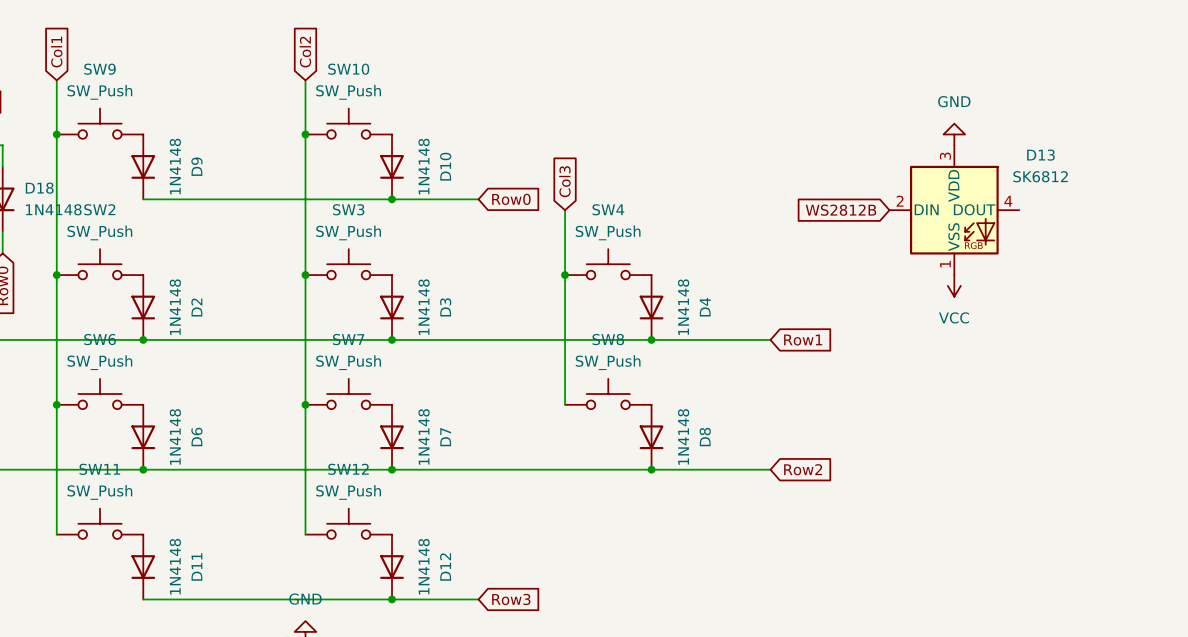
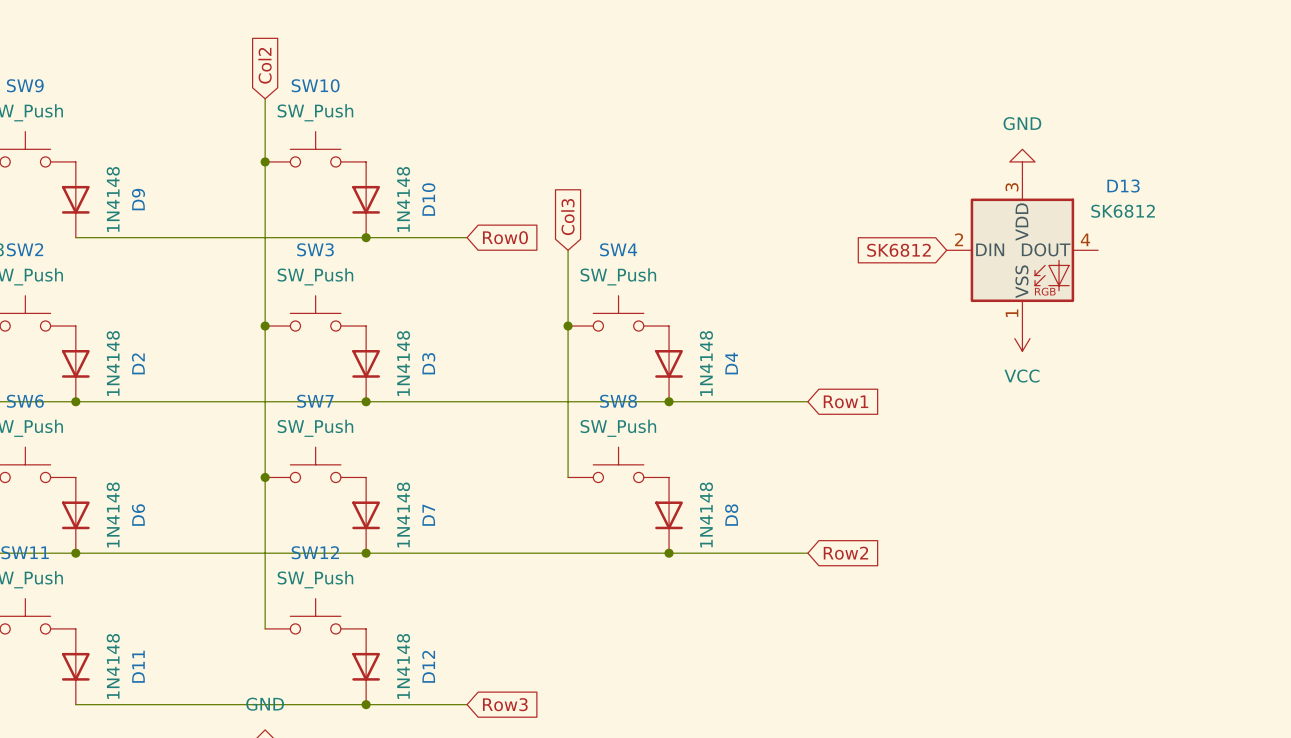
global label: WS2812B (841, 210) -> SK6812 (898, 250)

